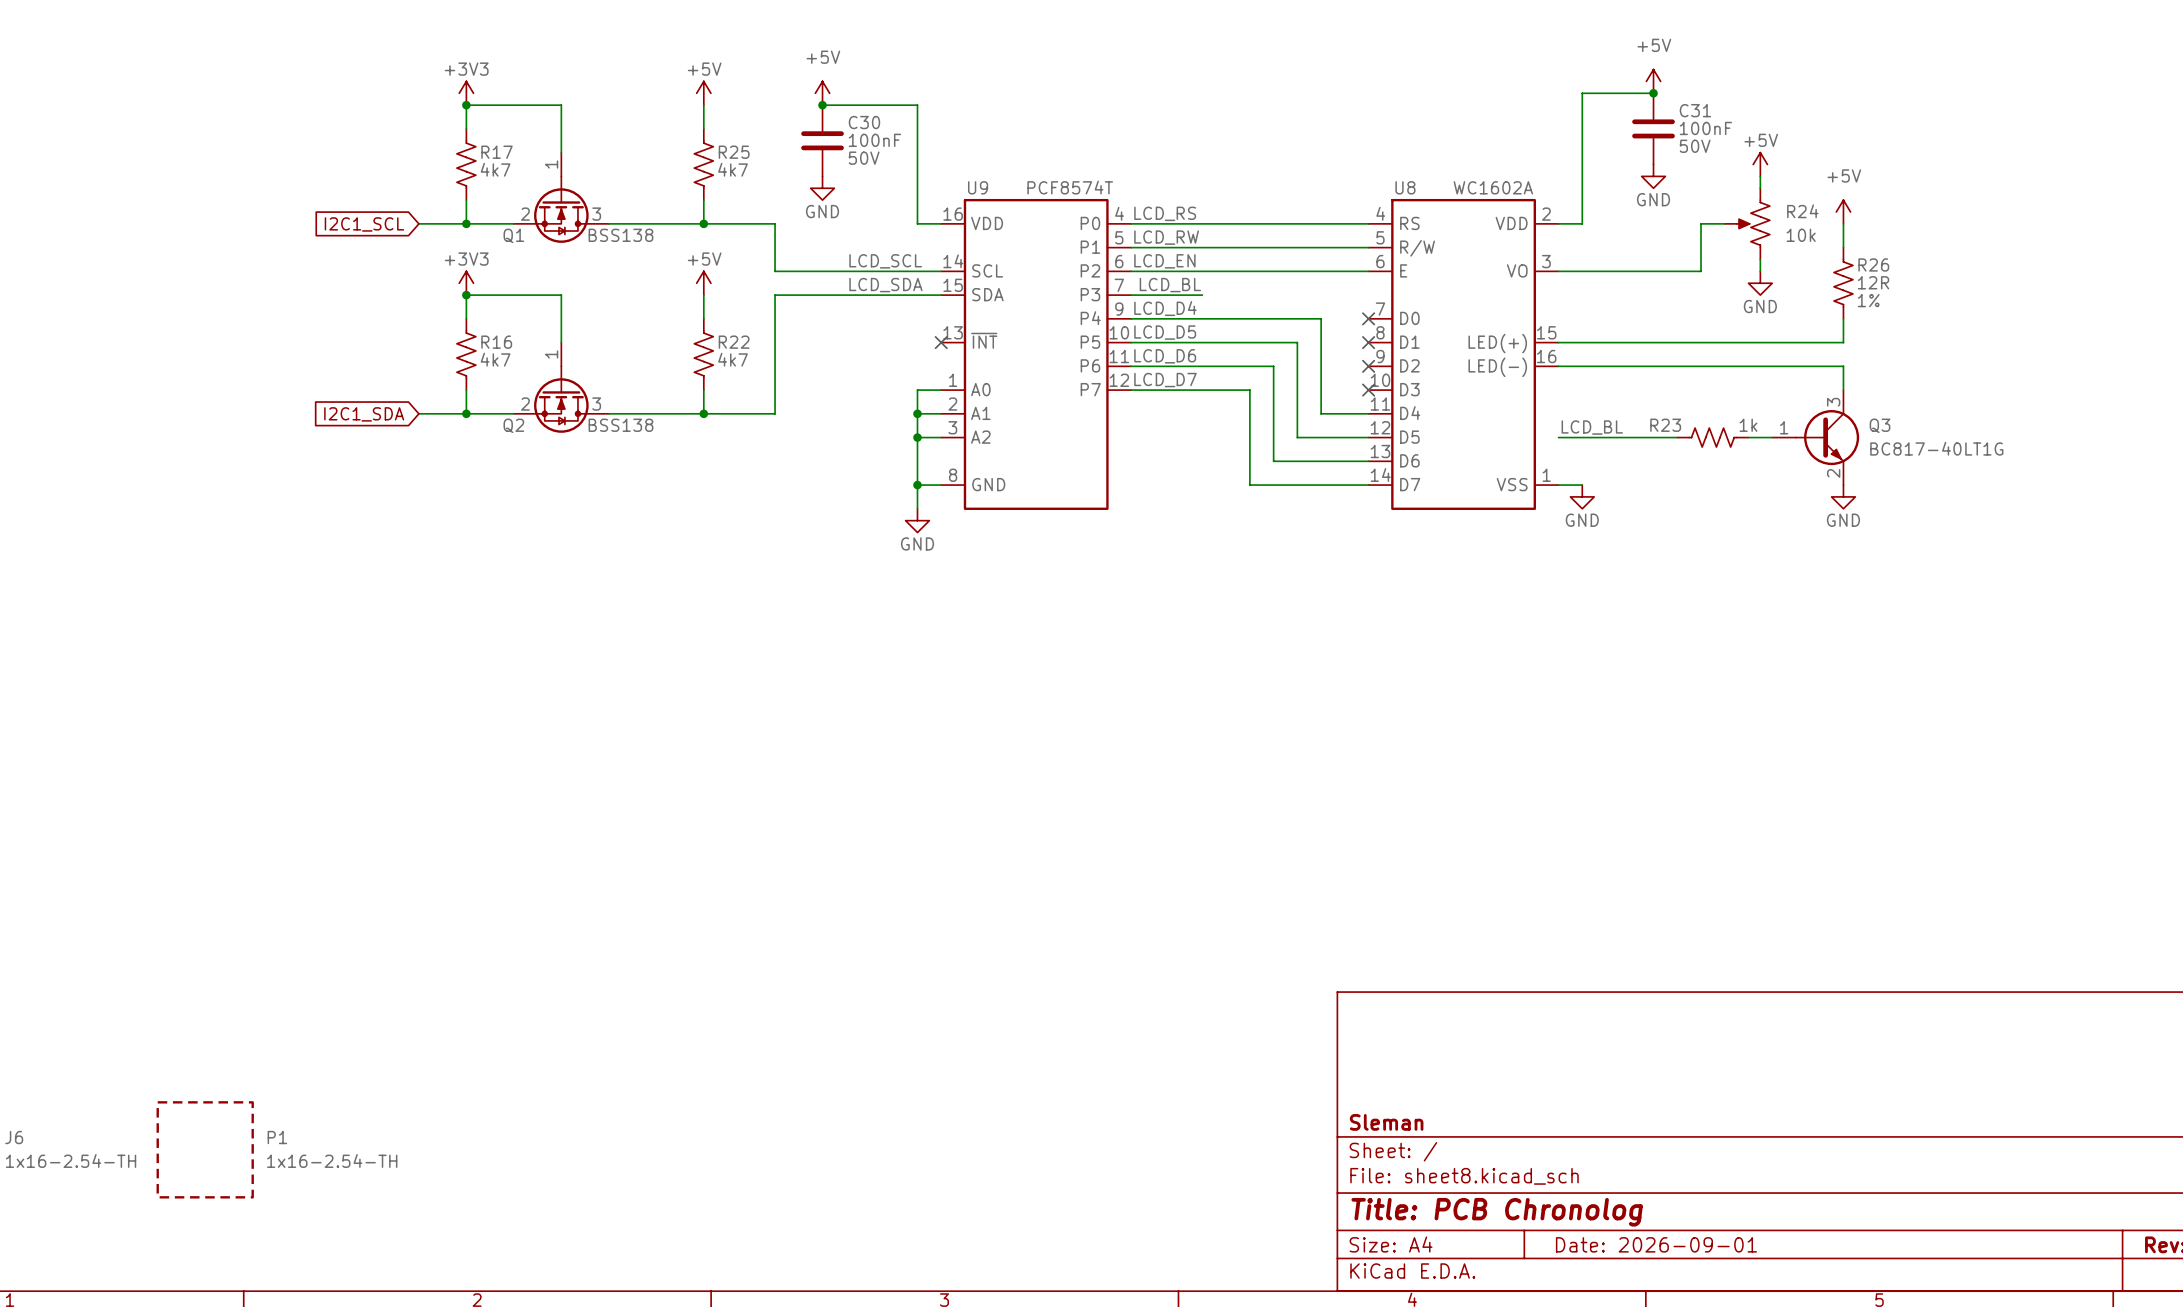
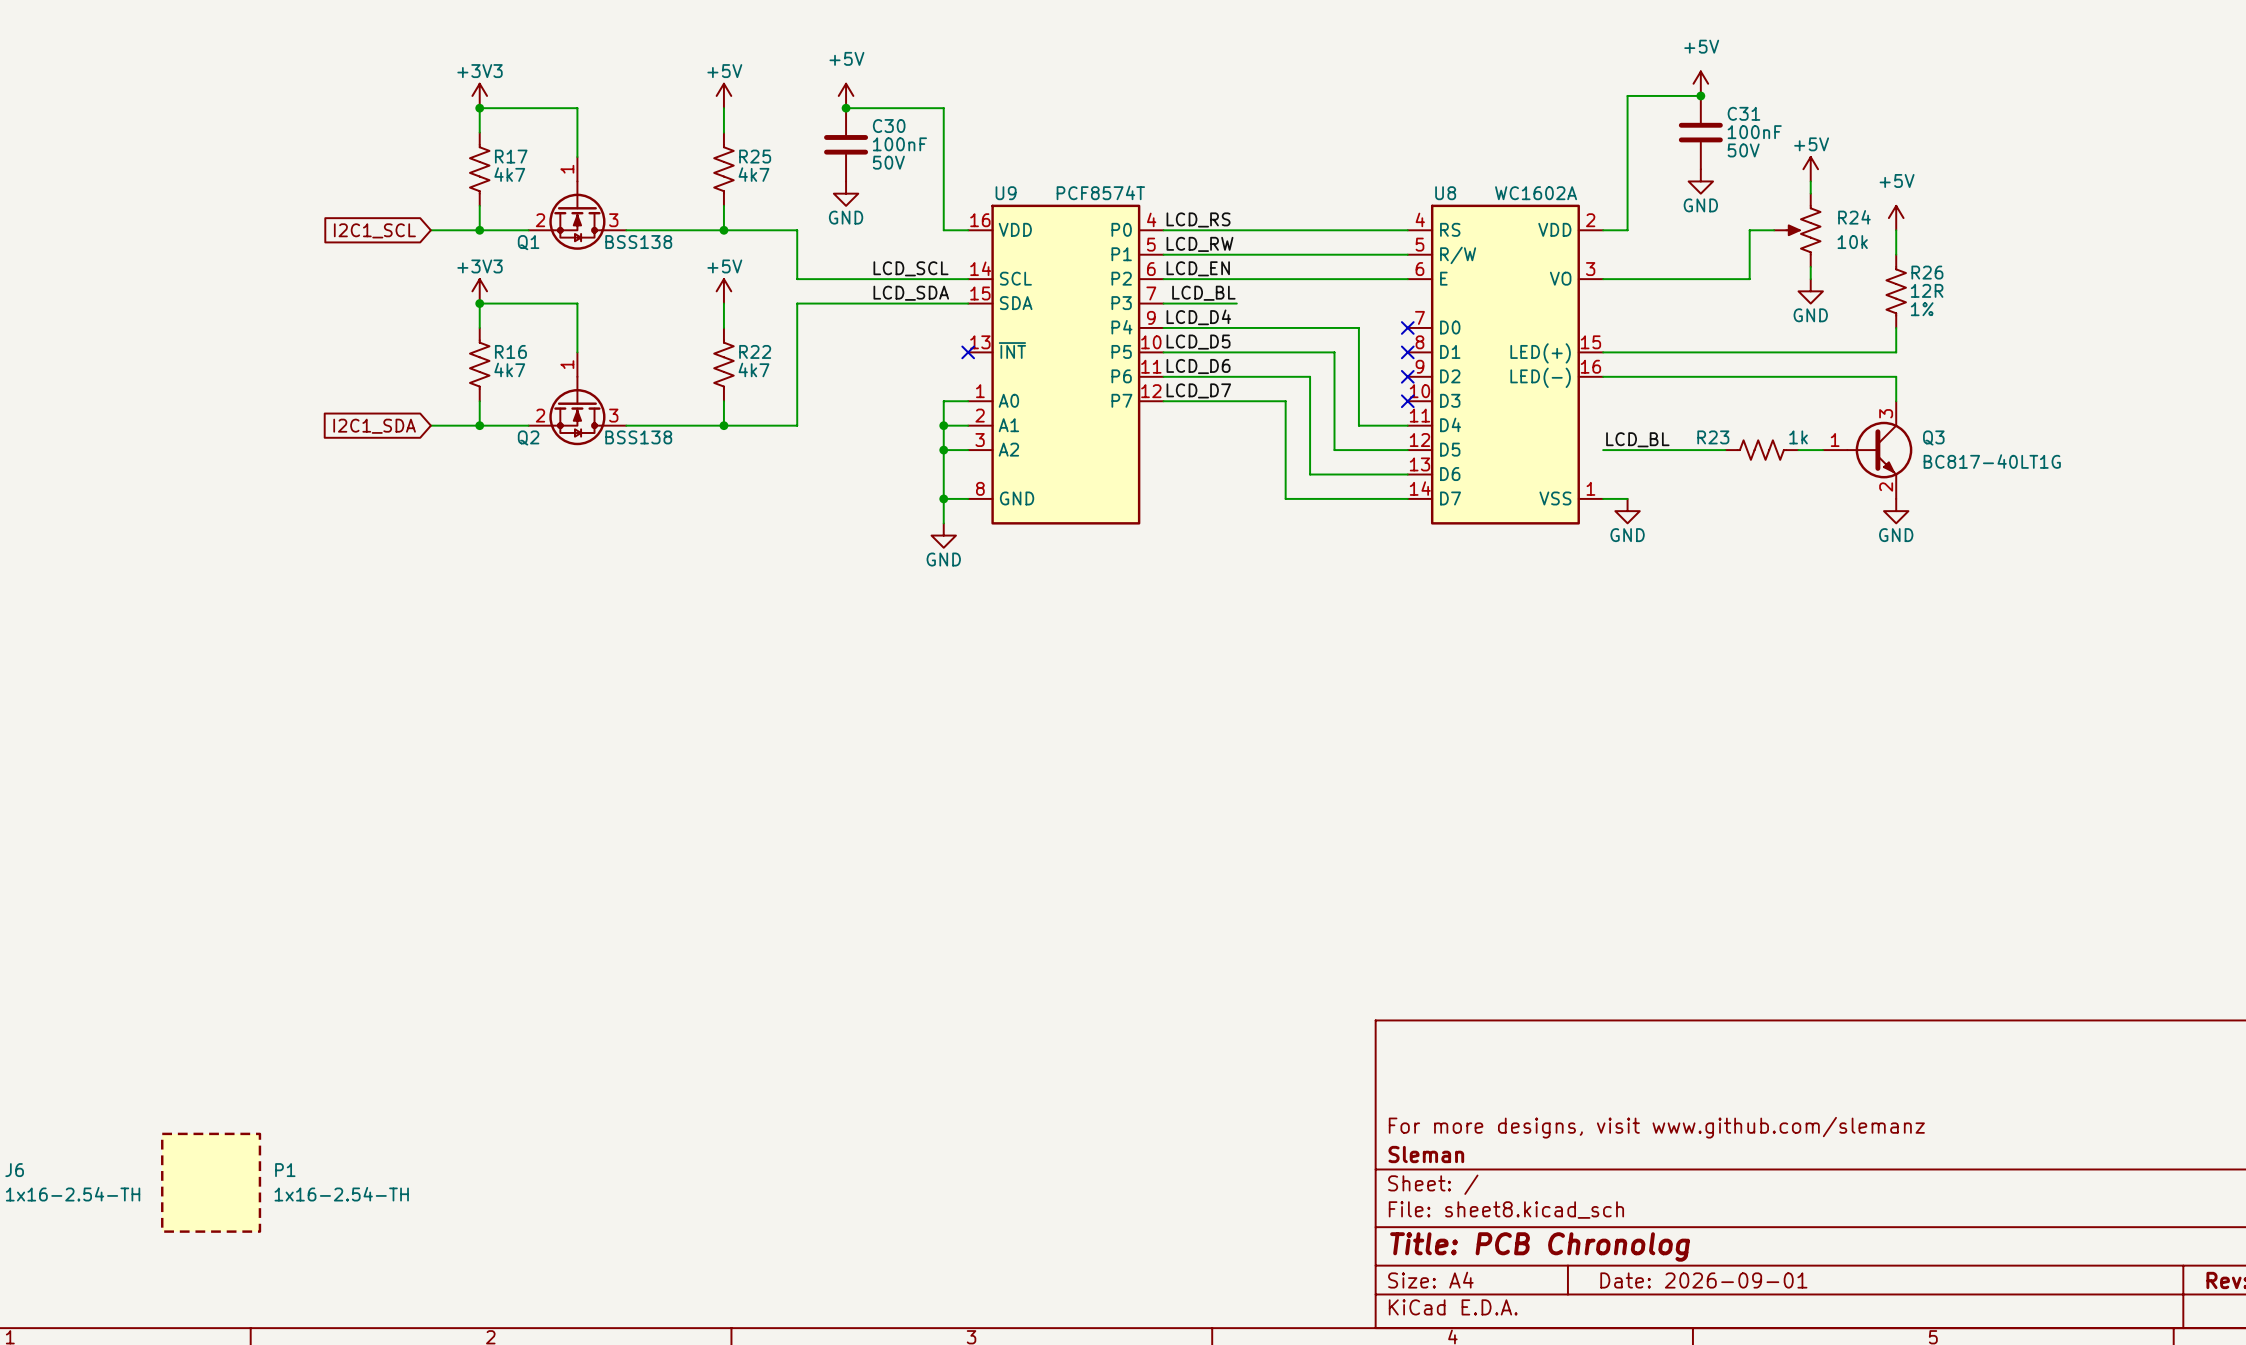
title block: none -> For more designs, visit www.github.com/slemanz (1656, 1127)

